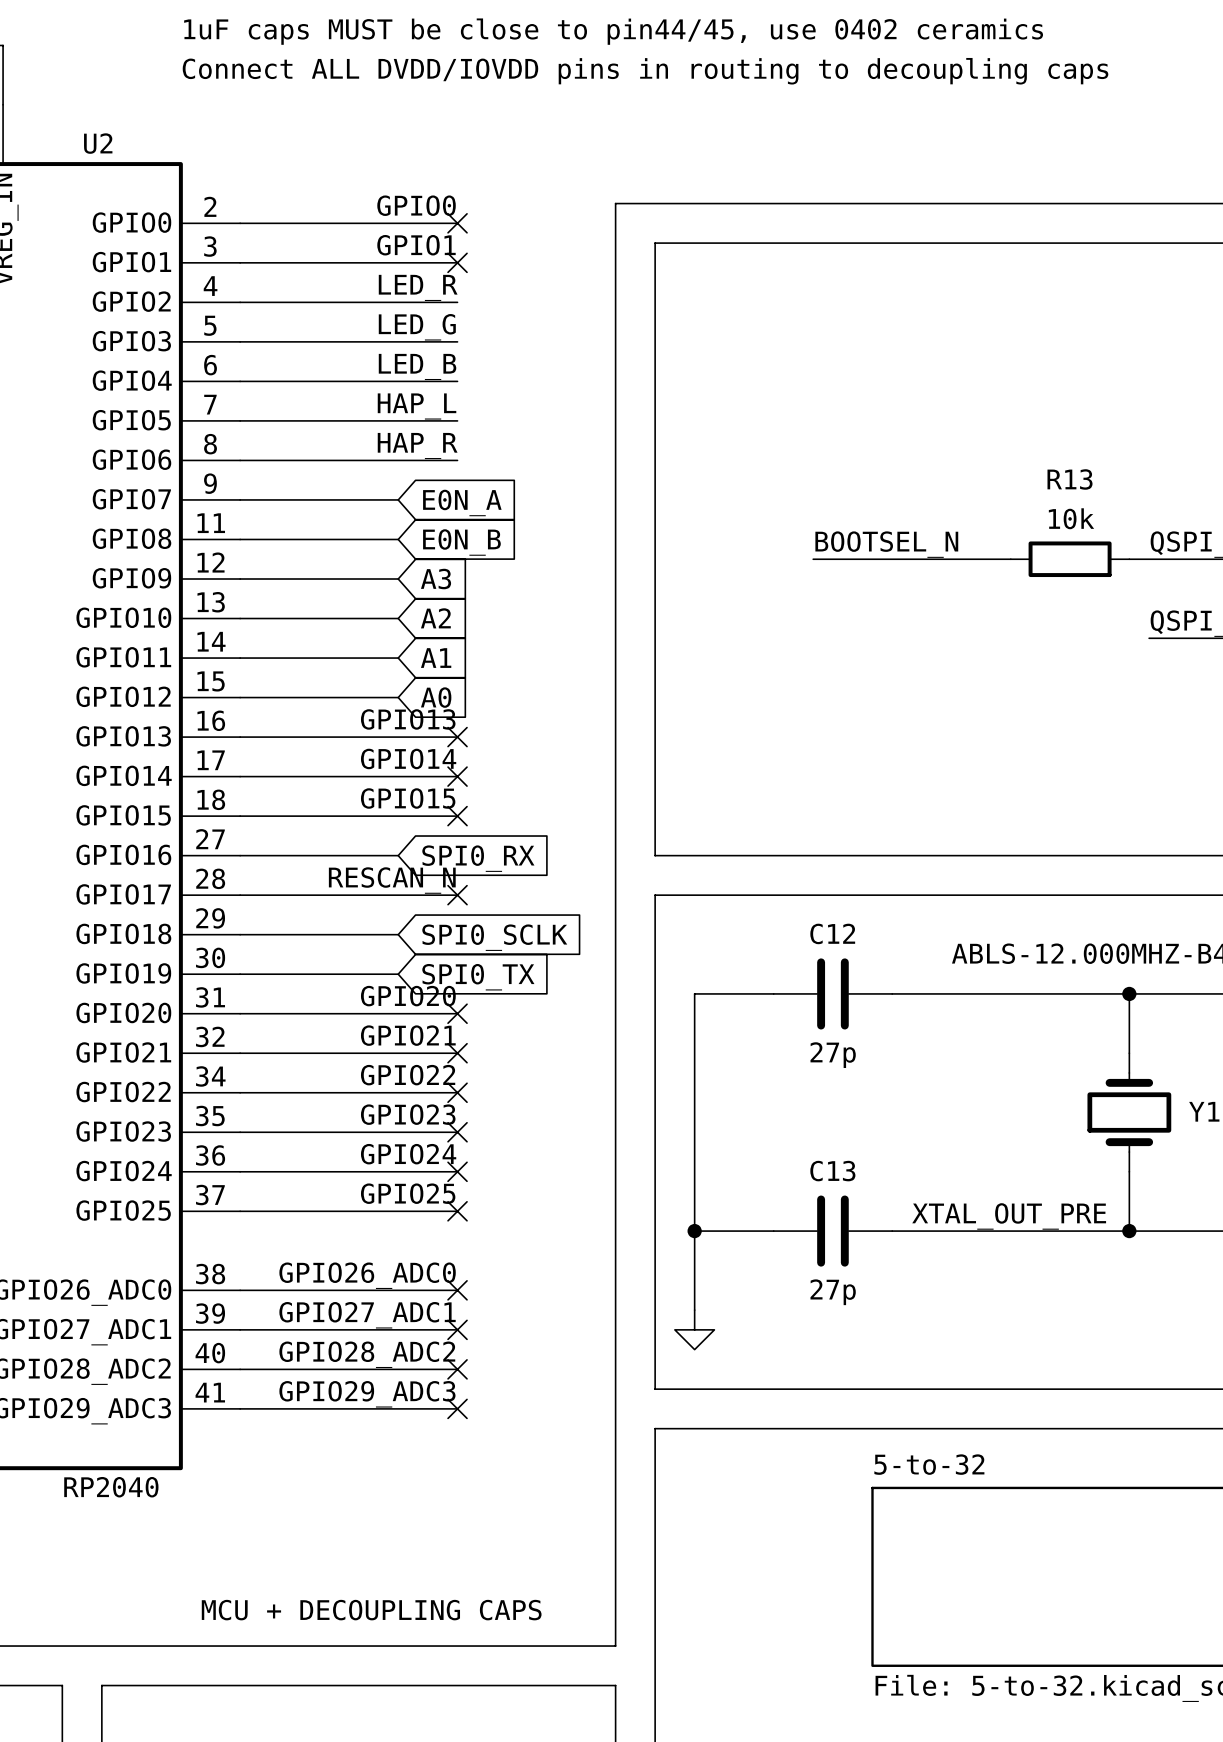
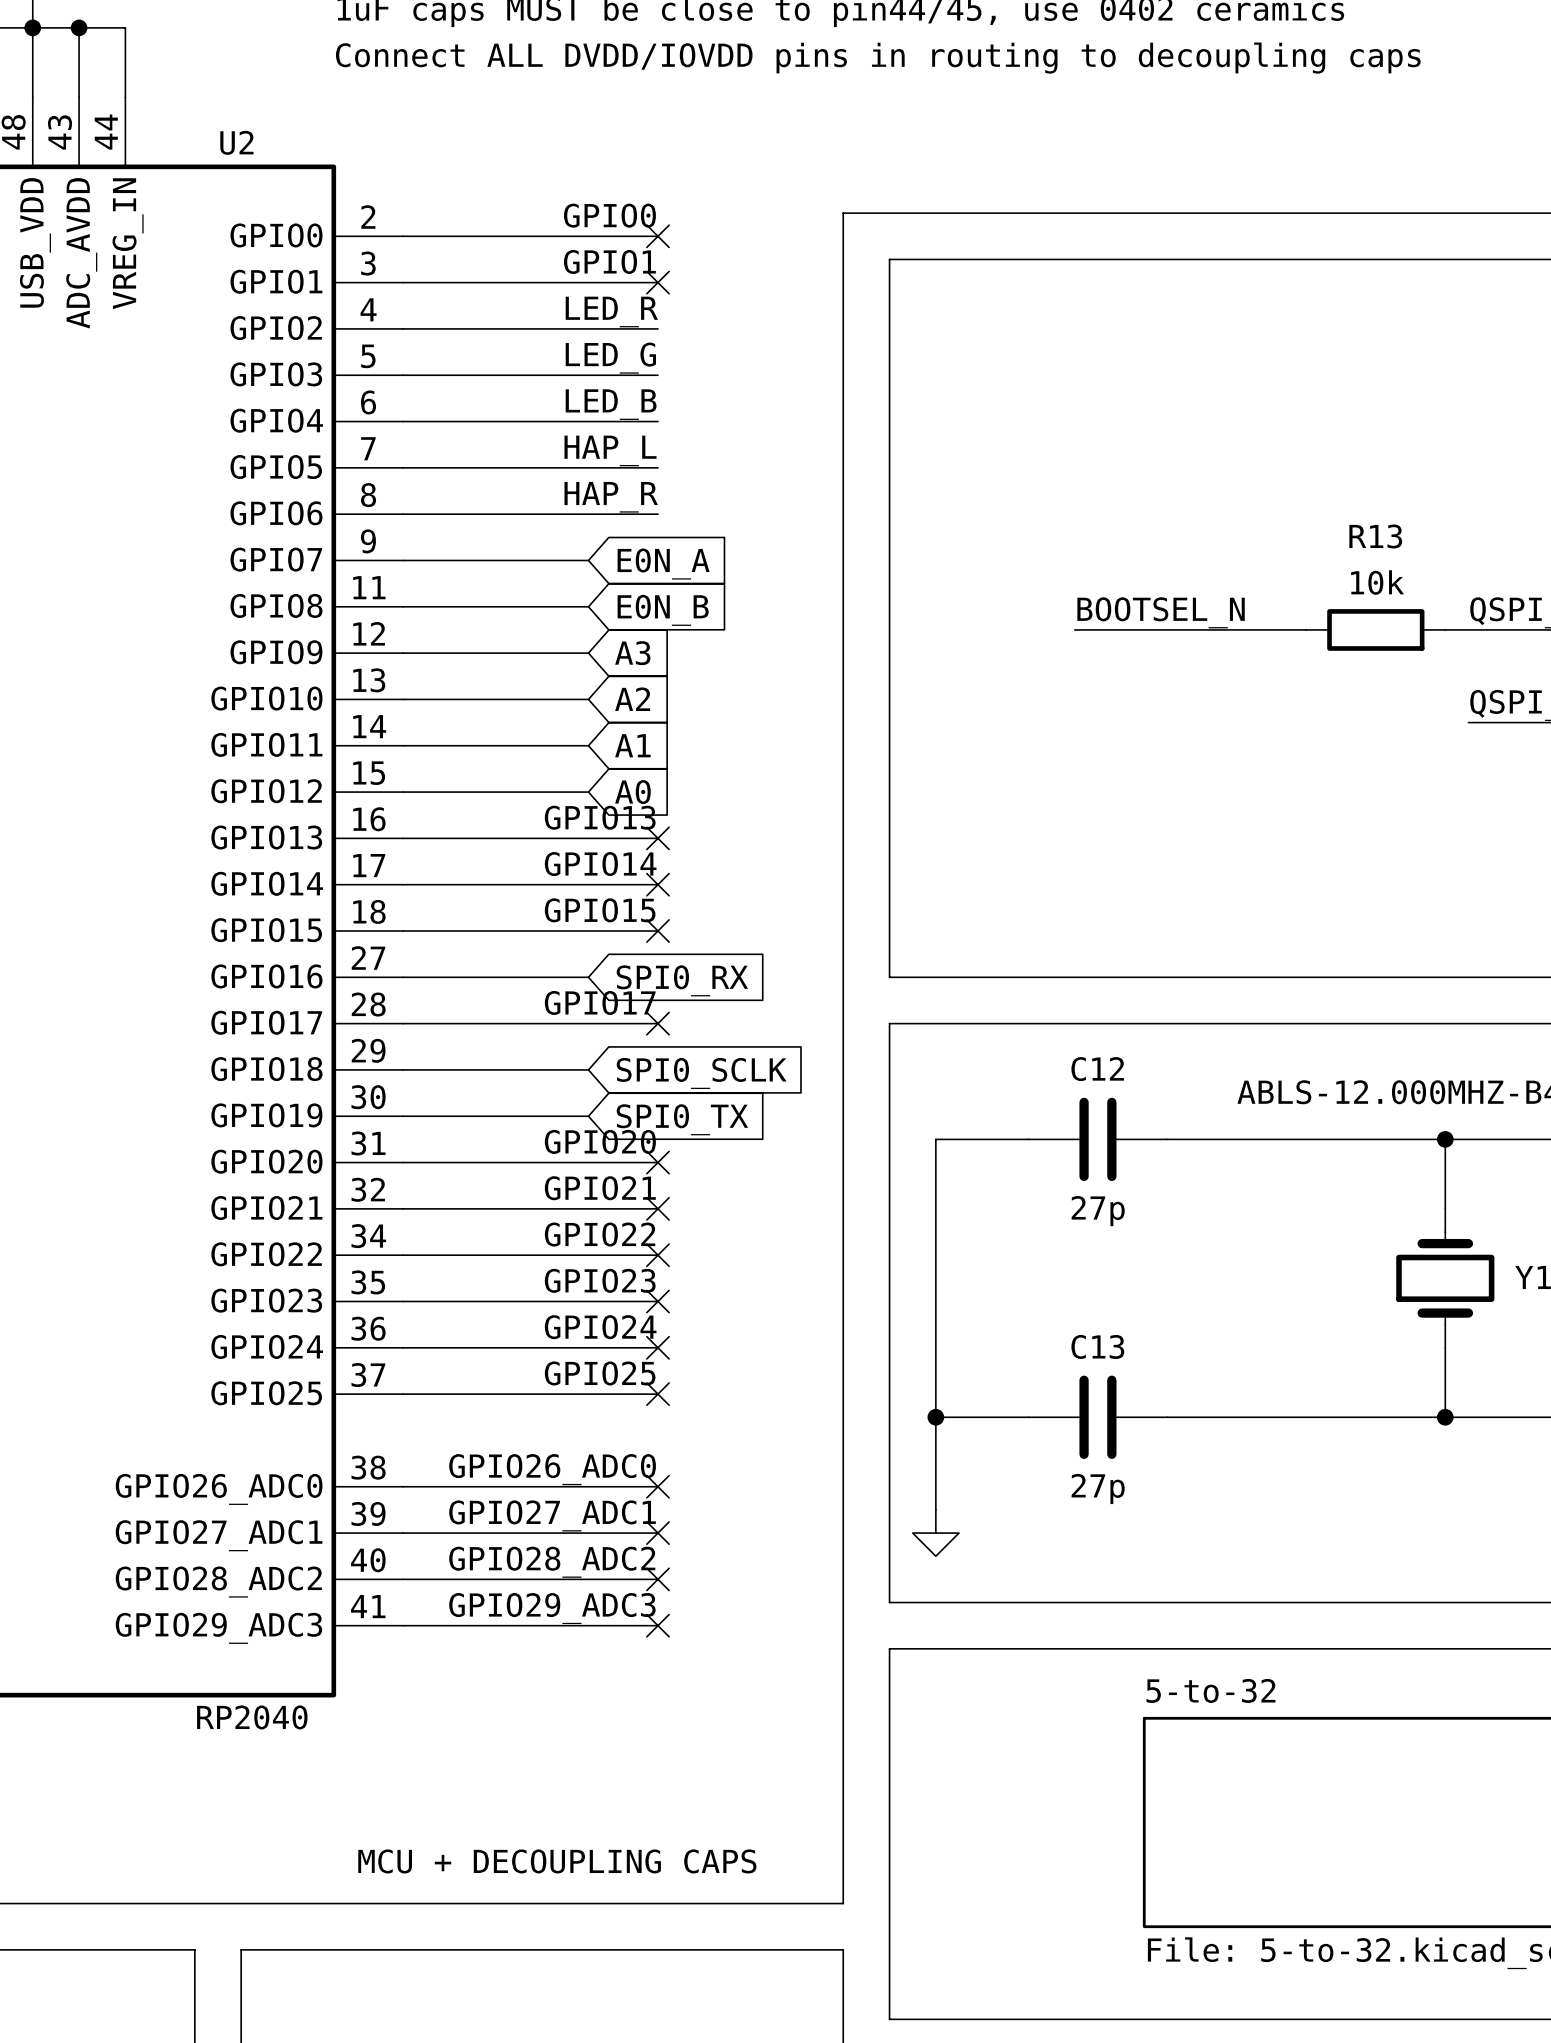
label: RESCAN_N (392, 880) -> GPIO17 (600, 1002)
label: XTAL_OUT_PRE (1009, 1216) -> none

